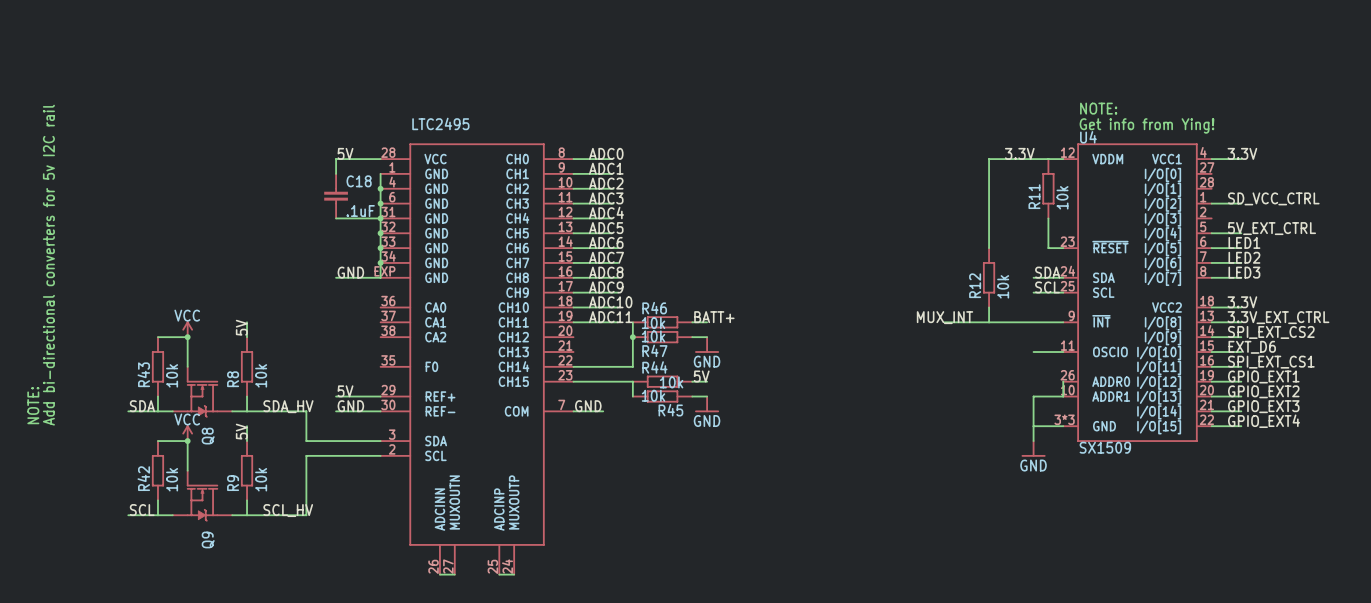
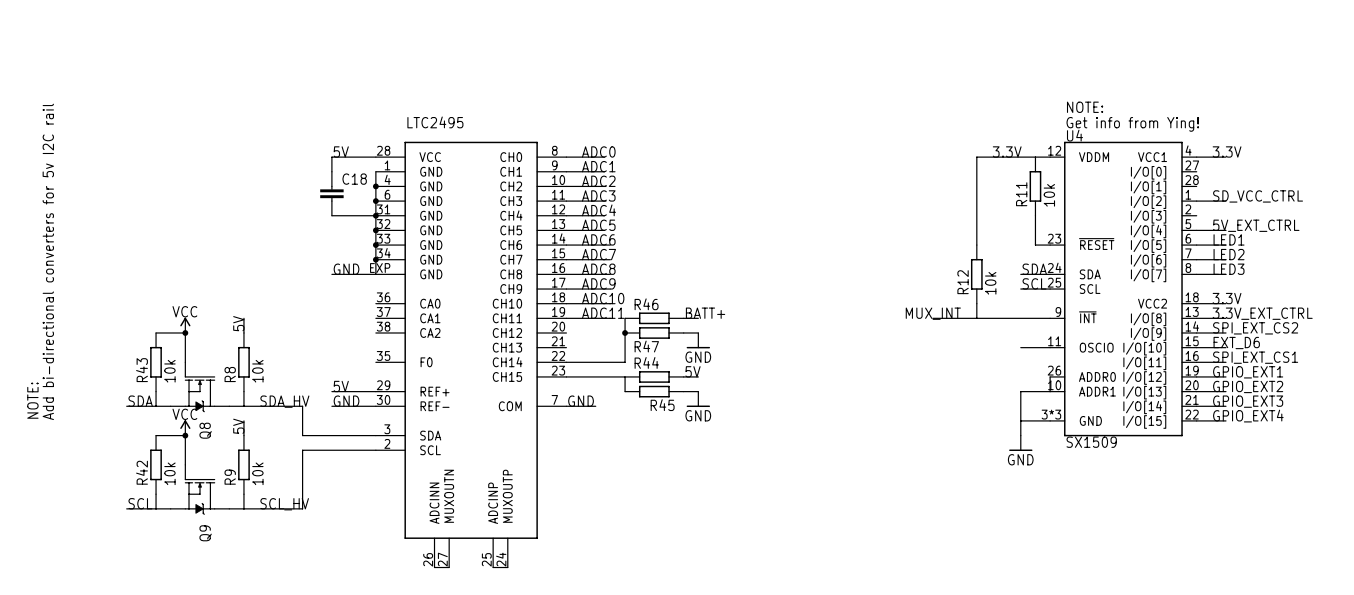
C18 value: .1uF (360, 211) -> none
R47 value: 10k (653, 323) -> none
R46 value: 10k (653, 336) -> none
R45 value: 10k (671, 382) -> none
R44 value: 10k (653, 395) -> none

